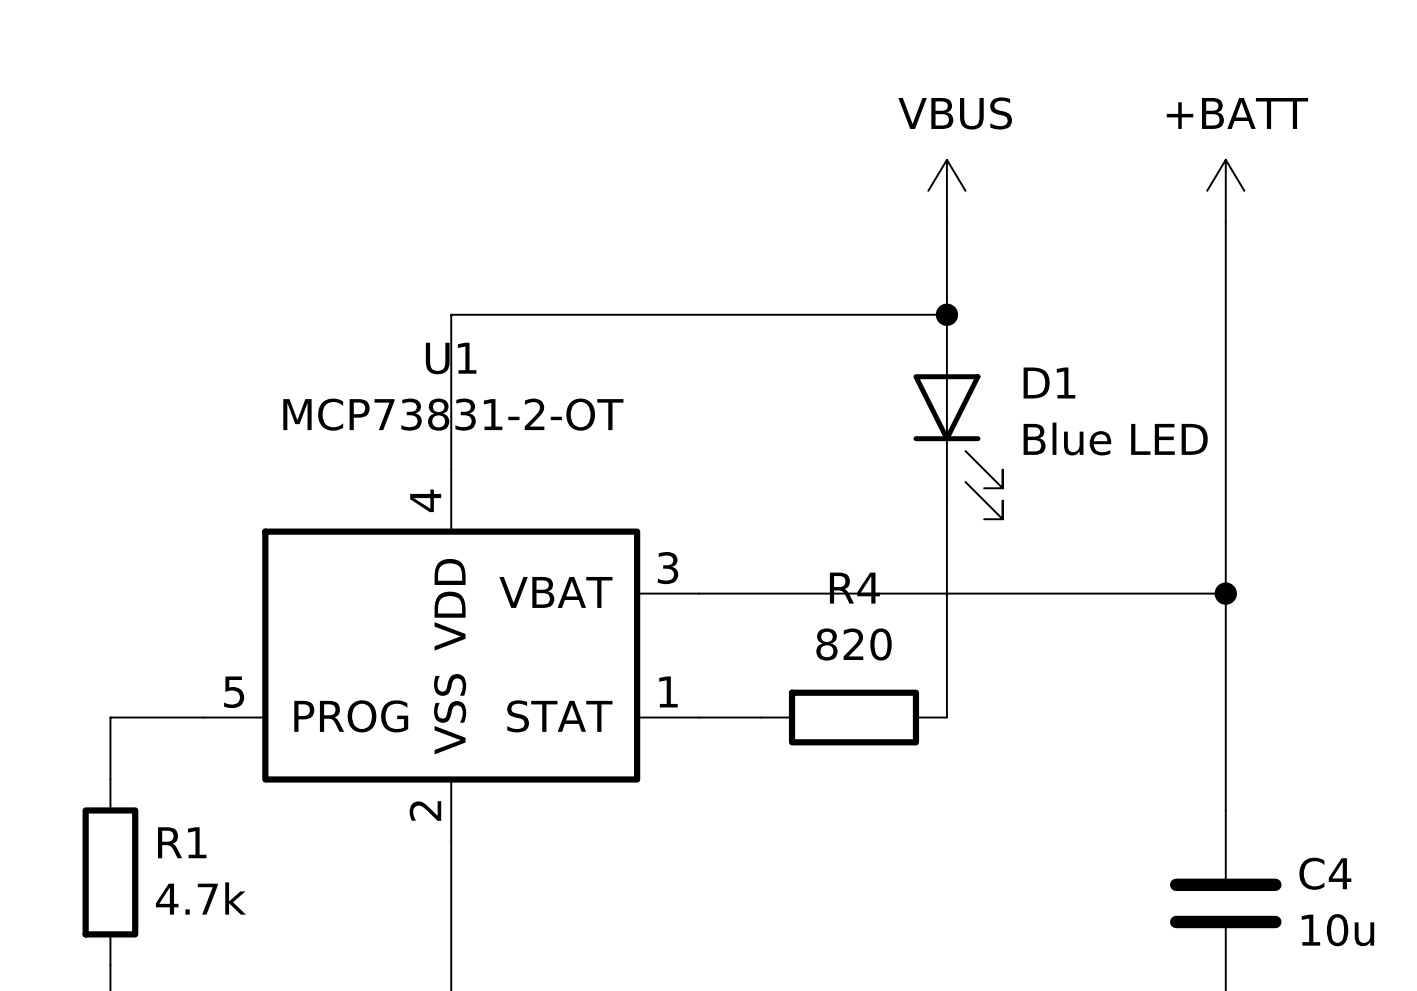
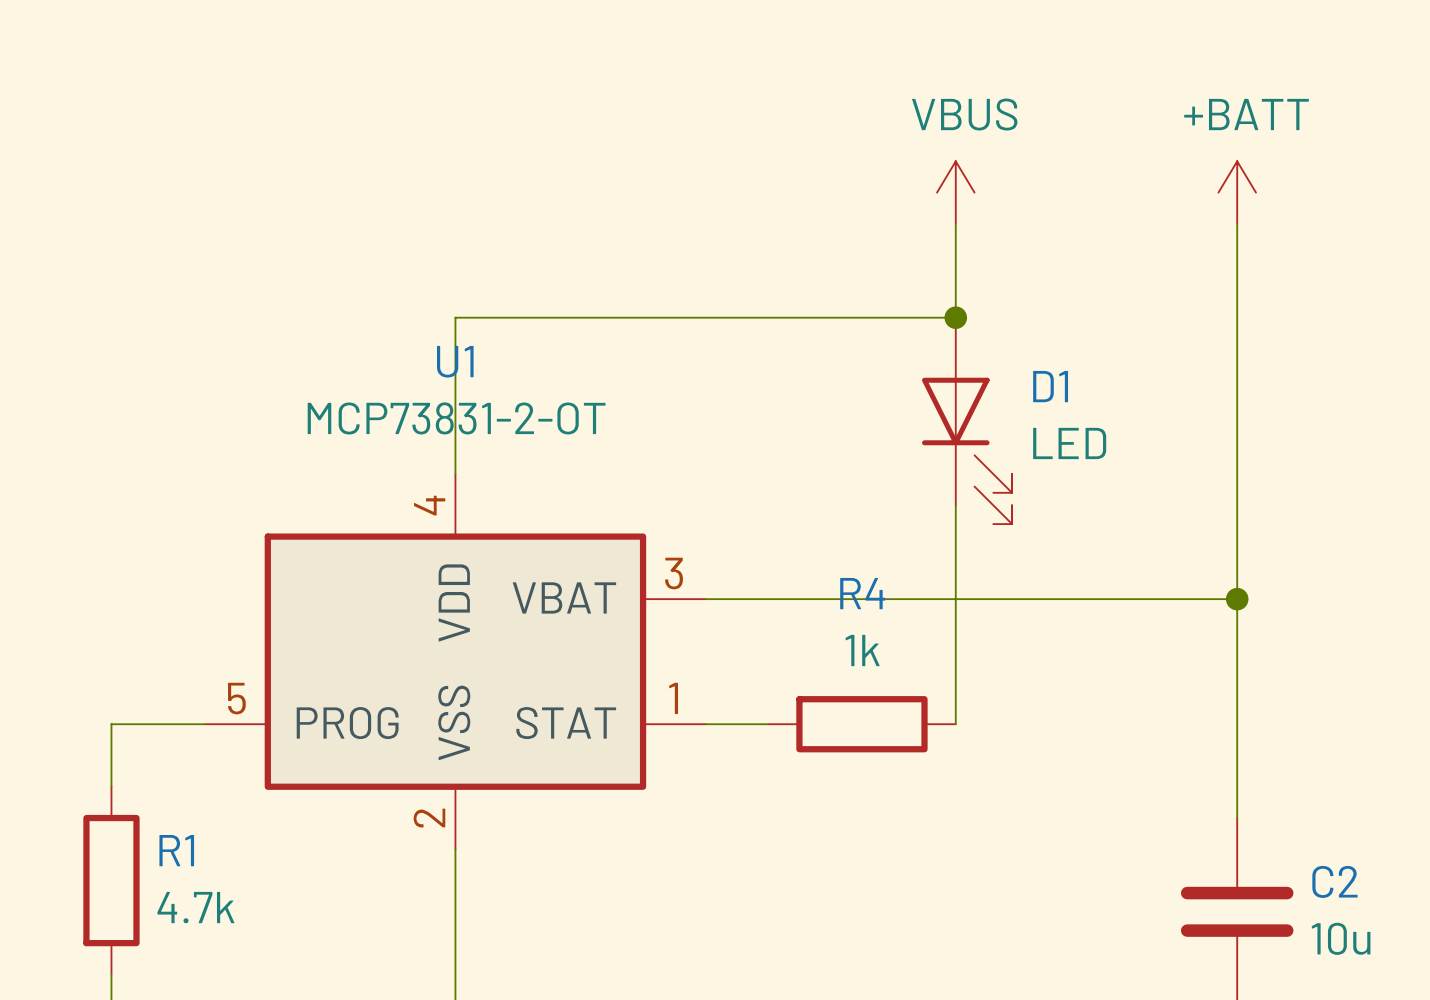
D1 value: Blue LED (1115, 439) -> LED (1069, 443)
R4 value: 820 (854, 644) -> 1k (862, 650)
C4 name: C4 (1325, 873) -> C2 (1334, 881)

